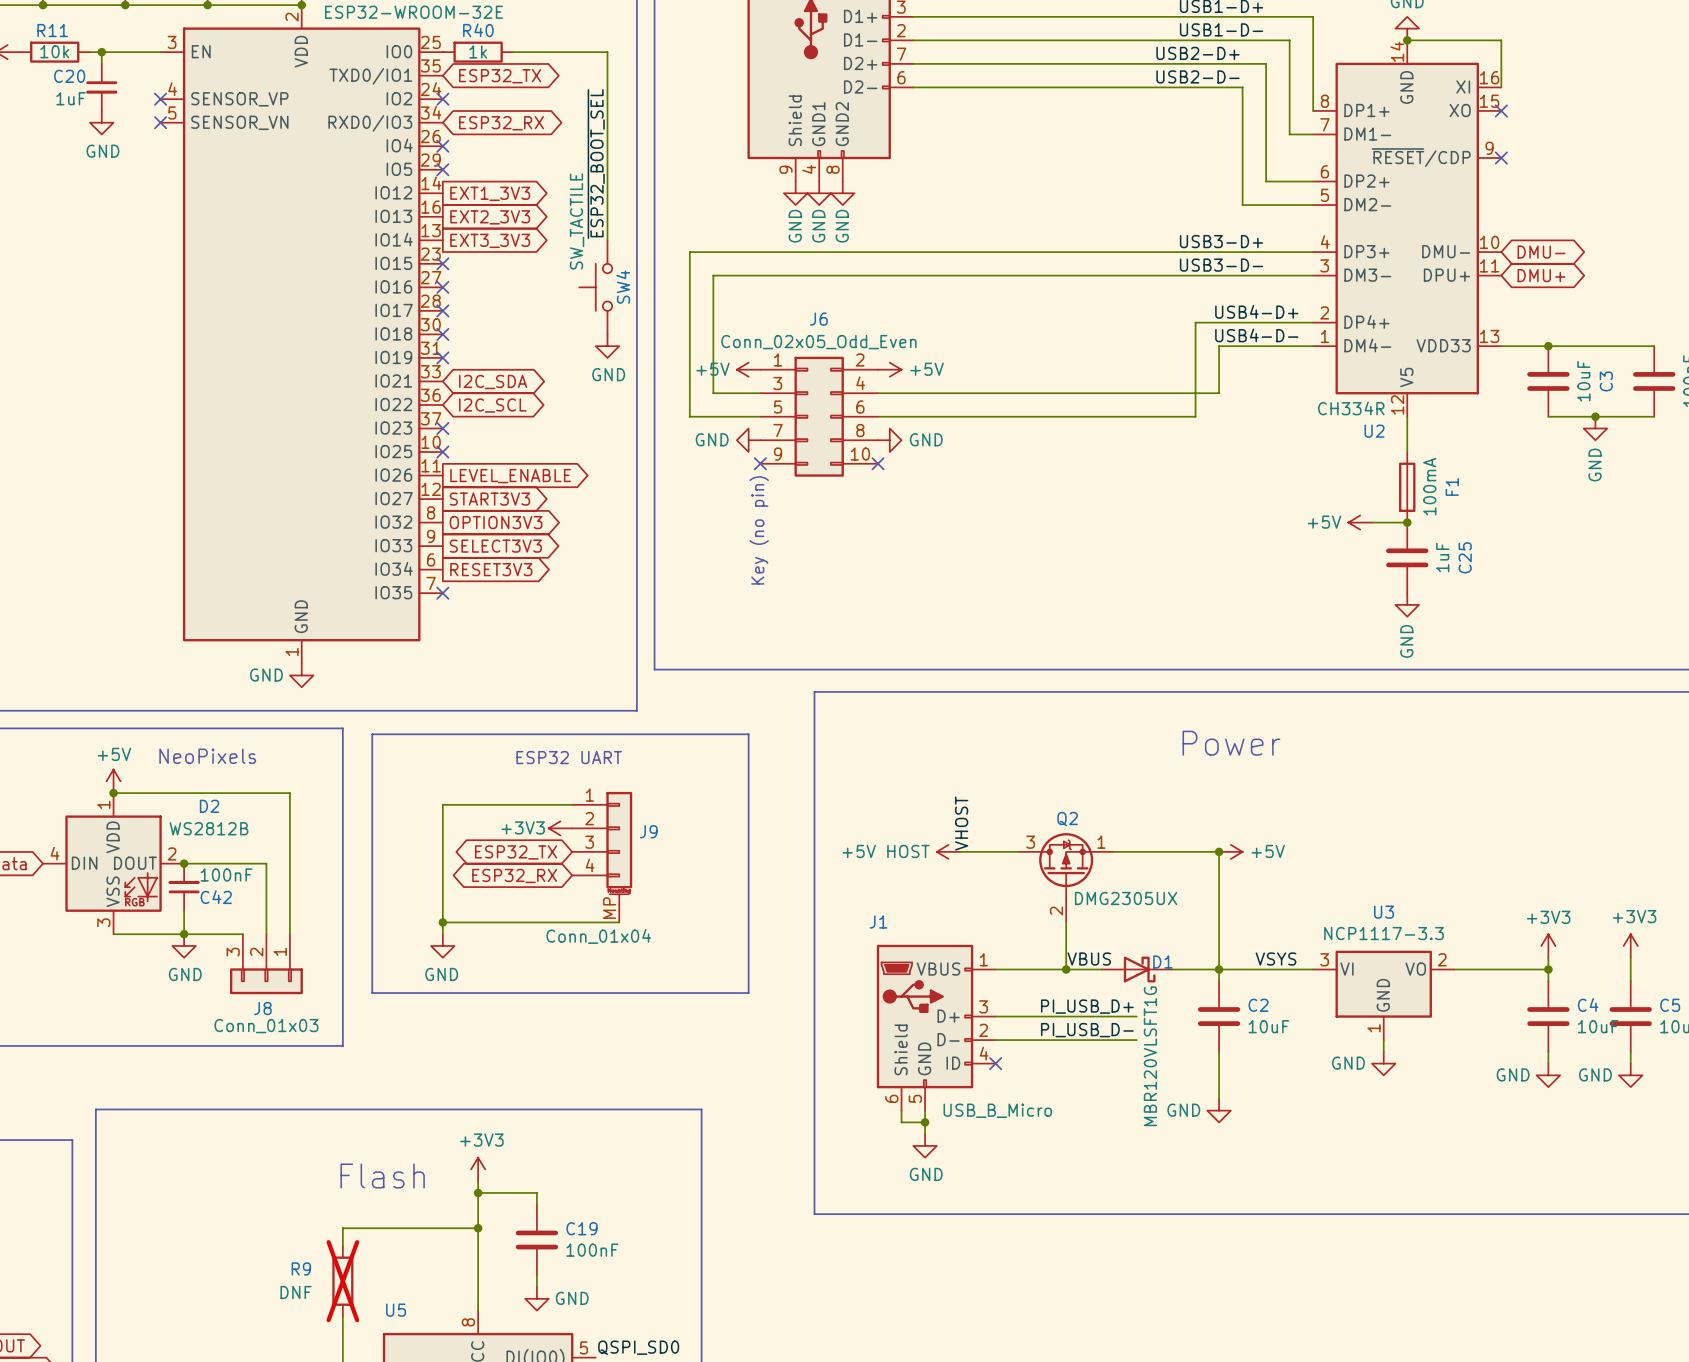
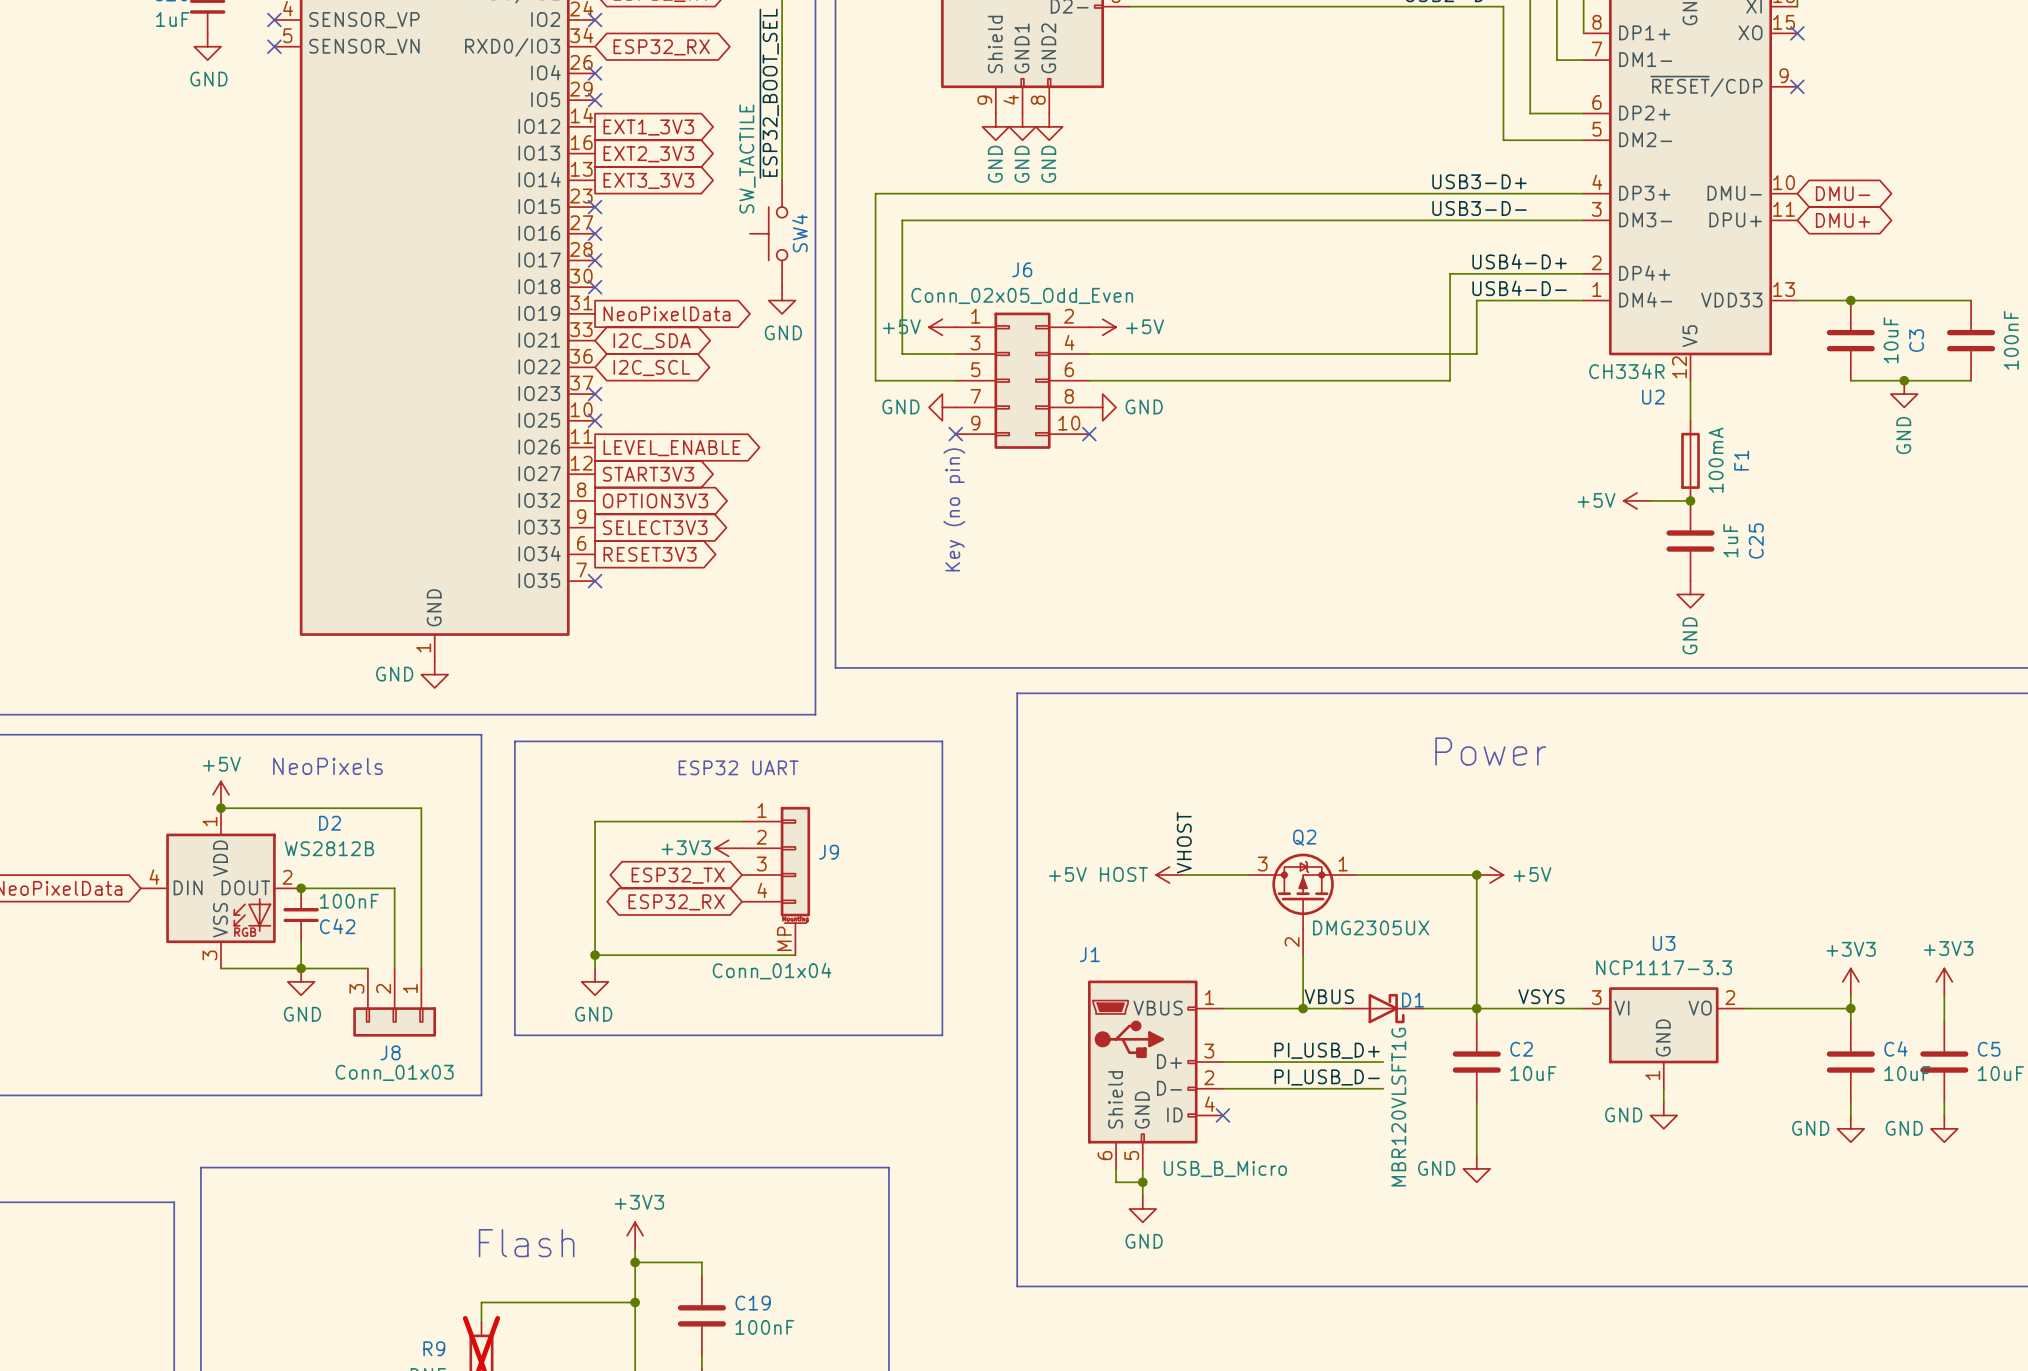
no-connect mark: (442, 357) -> none
global label: none -> NeoPixelData (666, 313)

